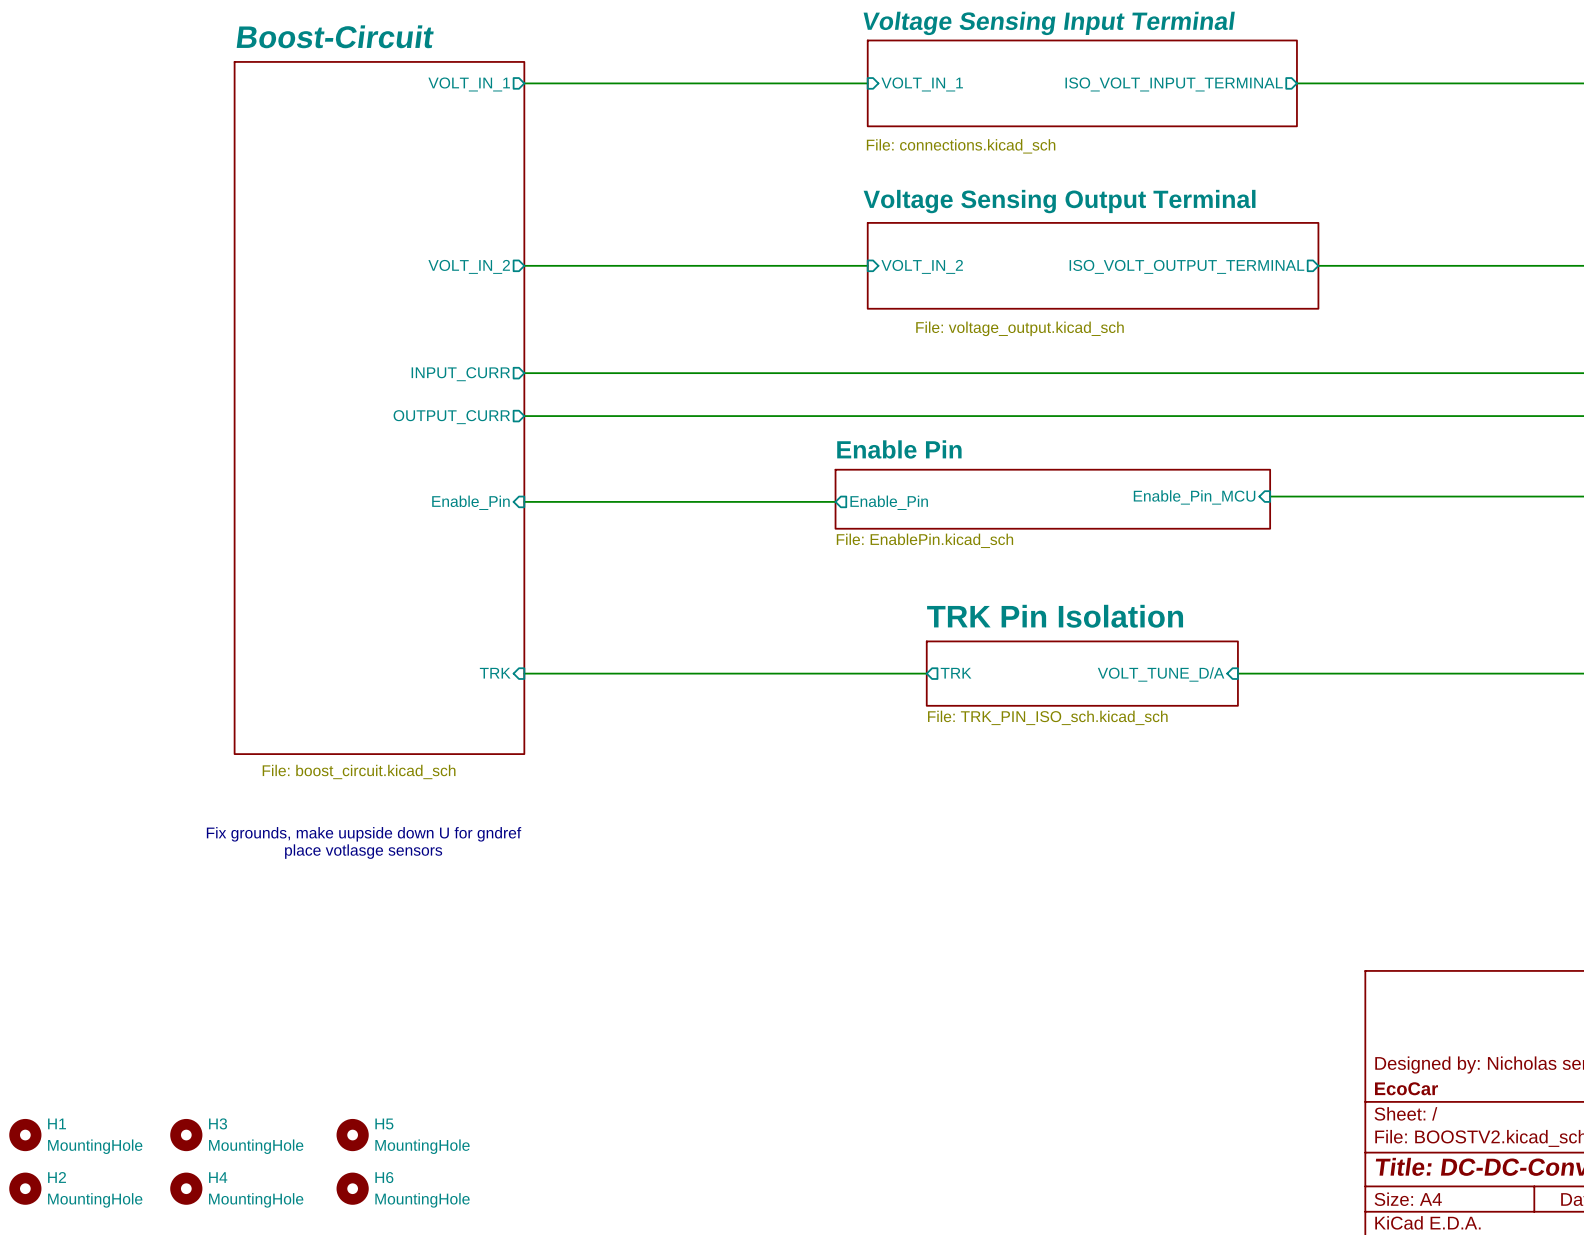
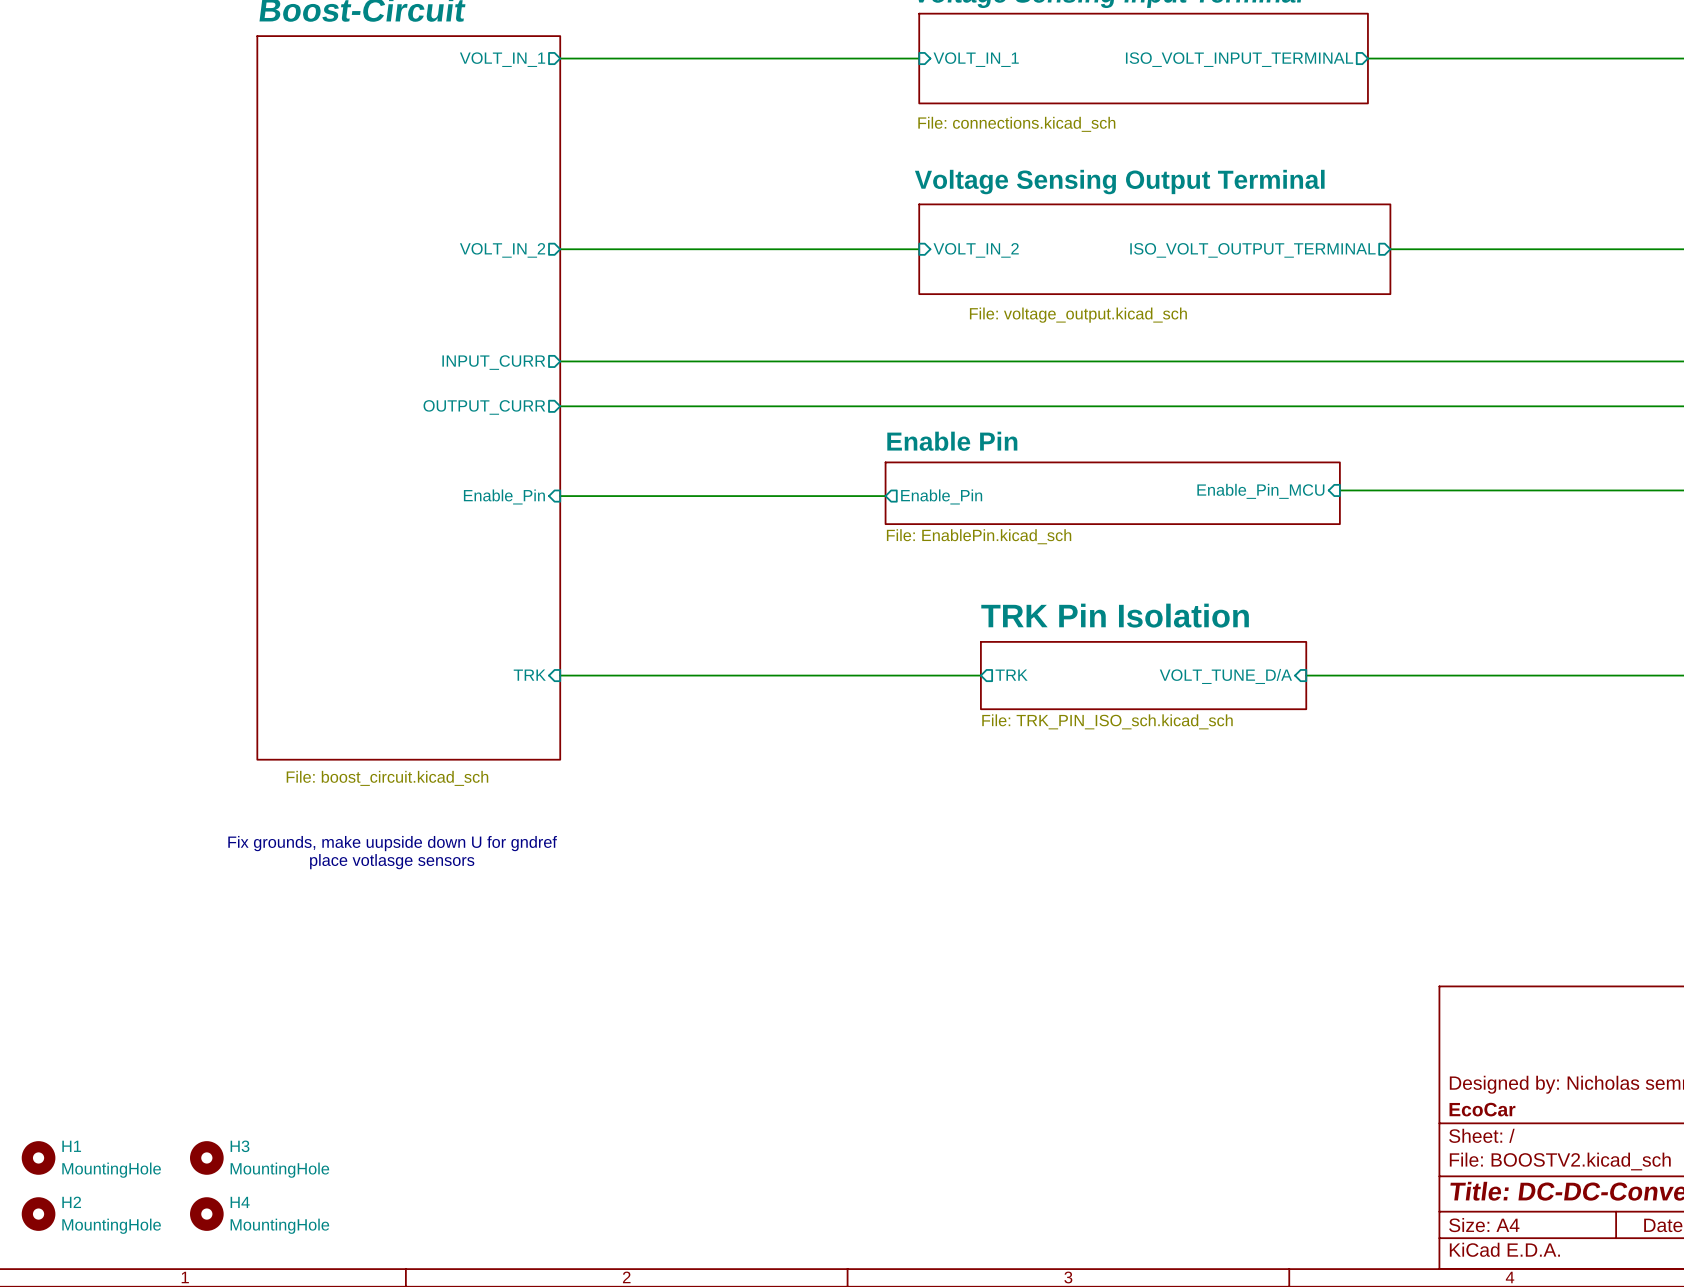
H5: MountingHole (352, 1135) -> none
H6: MountingHole (352, 1188) -> none

